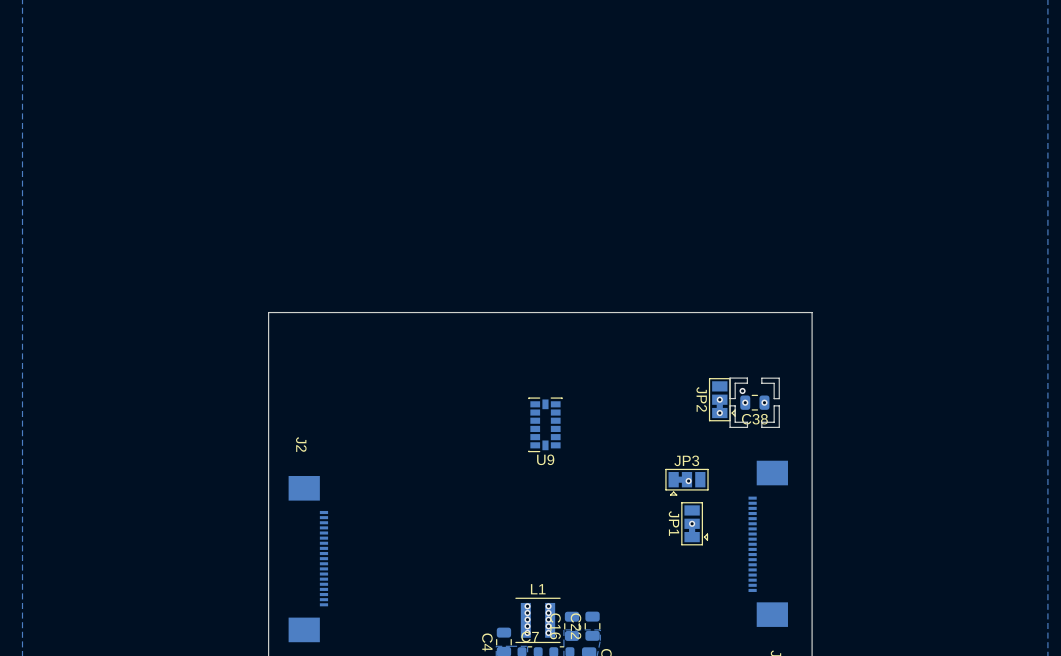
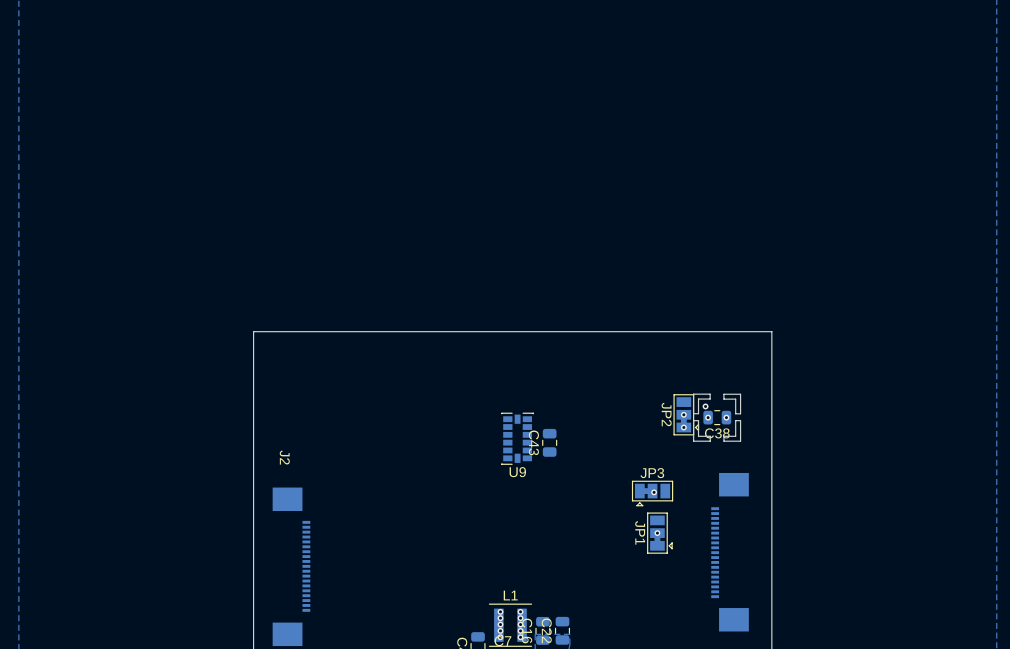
C43: none -> (549, 442)

